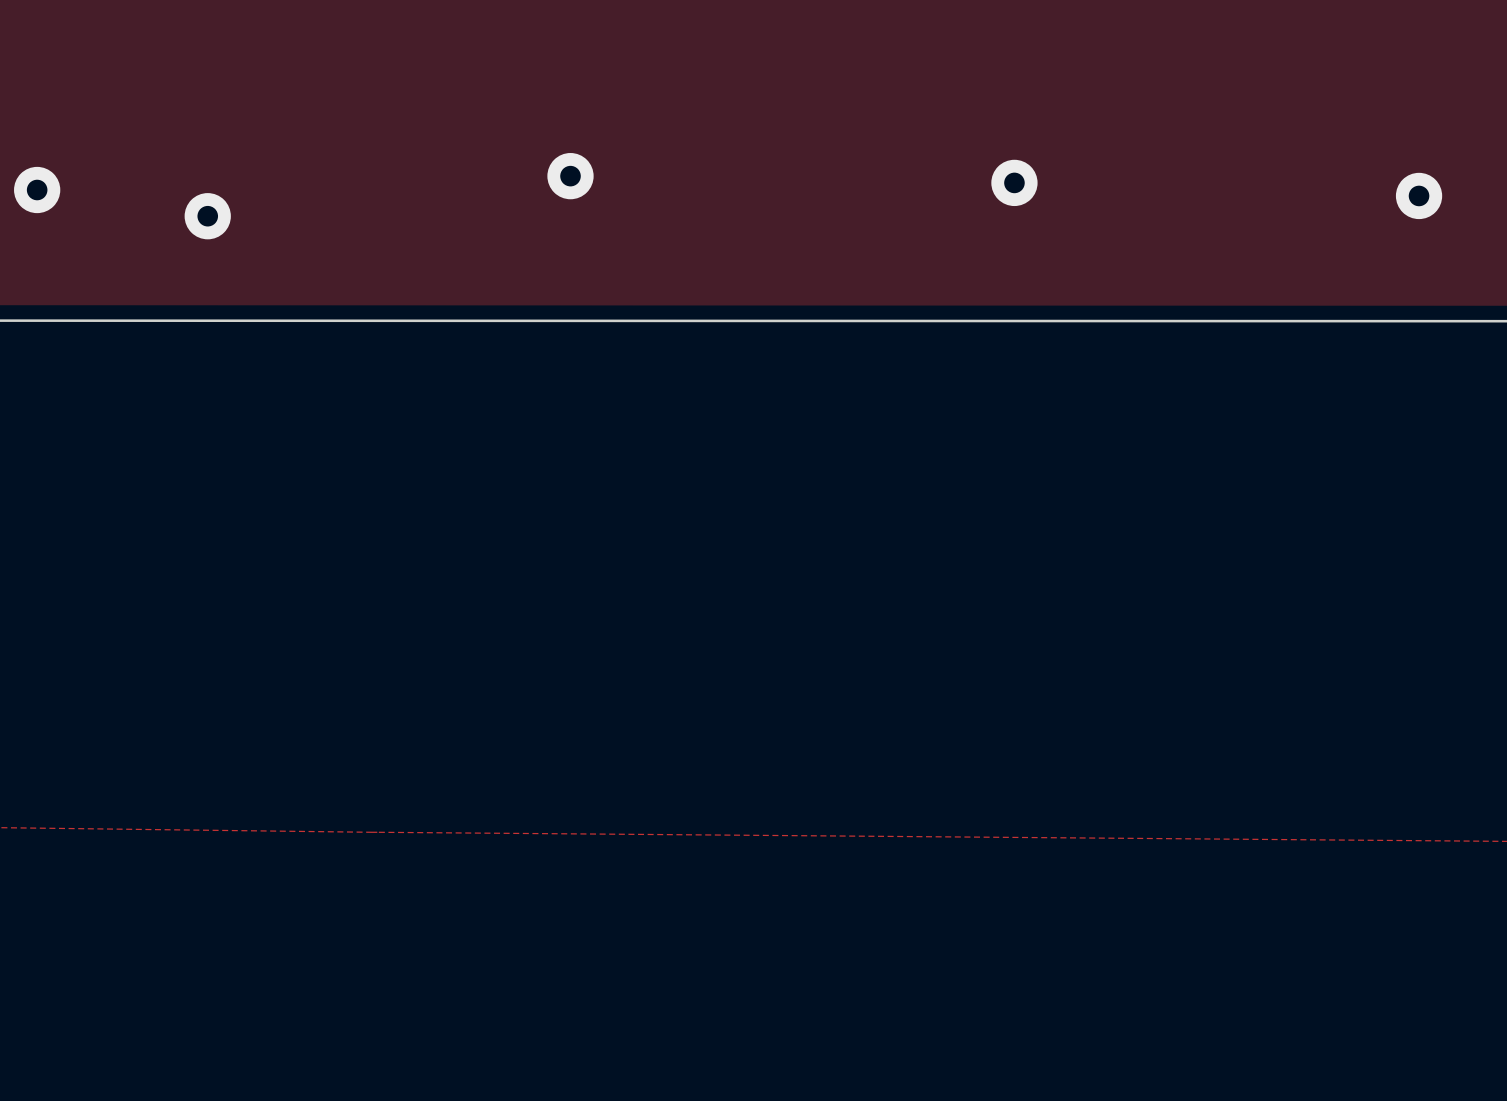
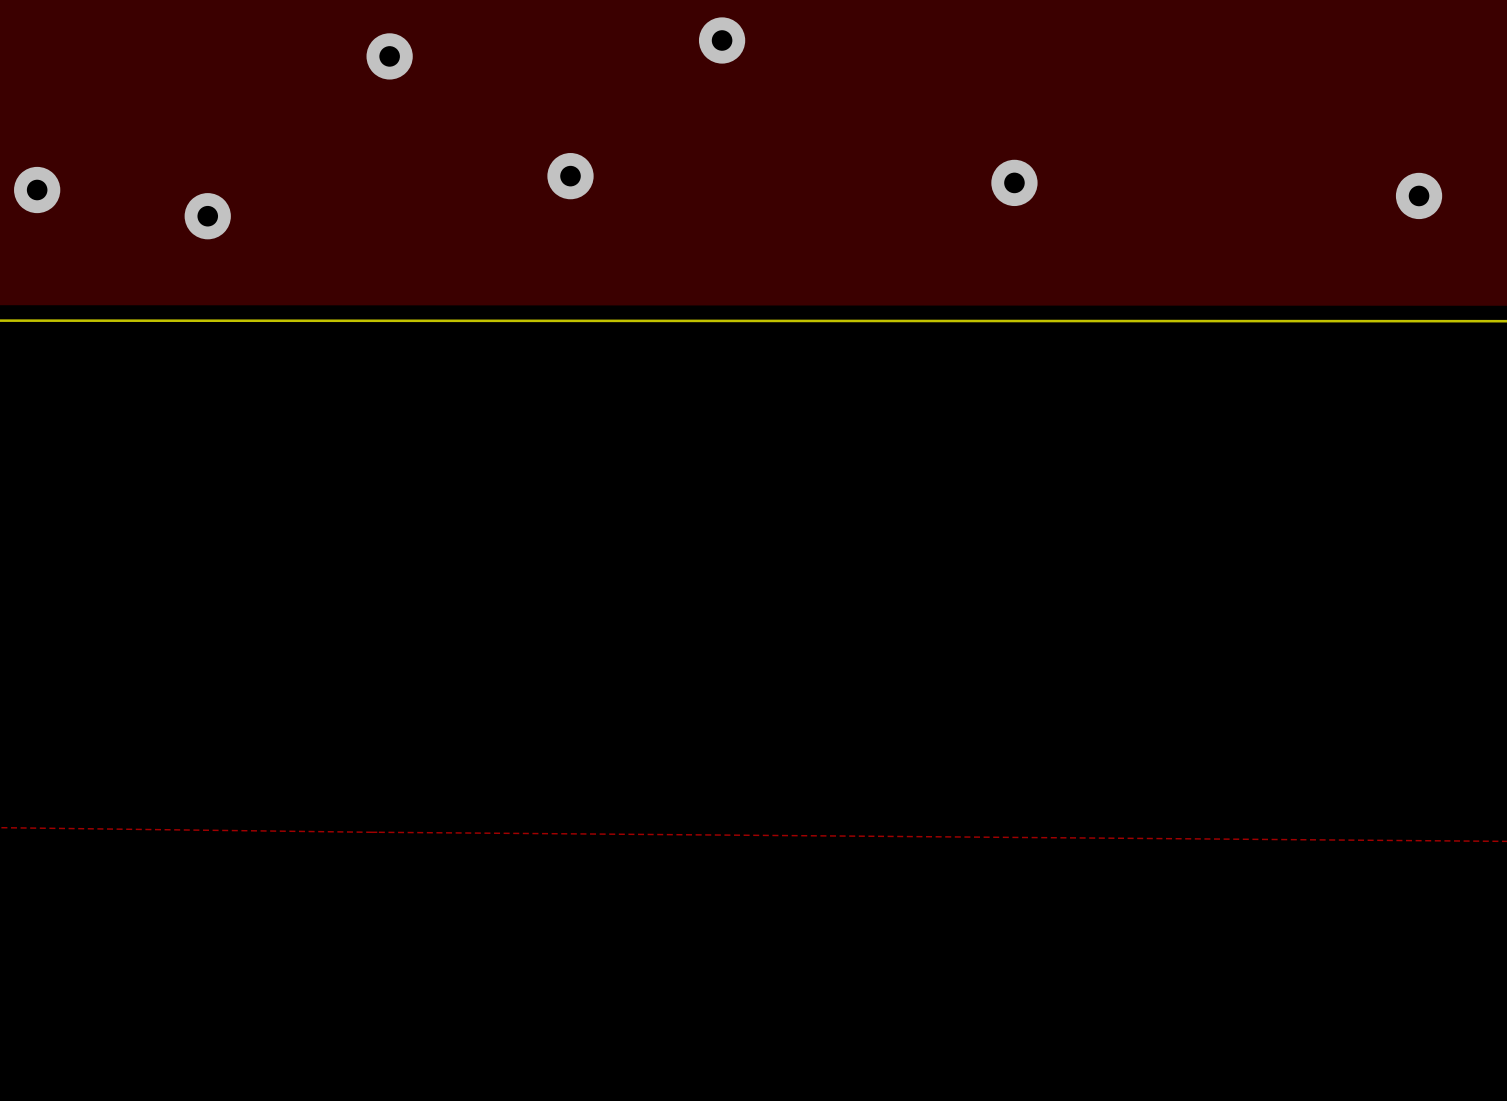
via: none -> (722, 40)
via: none -> (389, 56)

